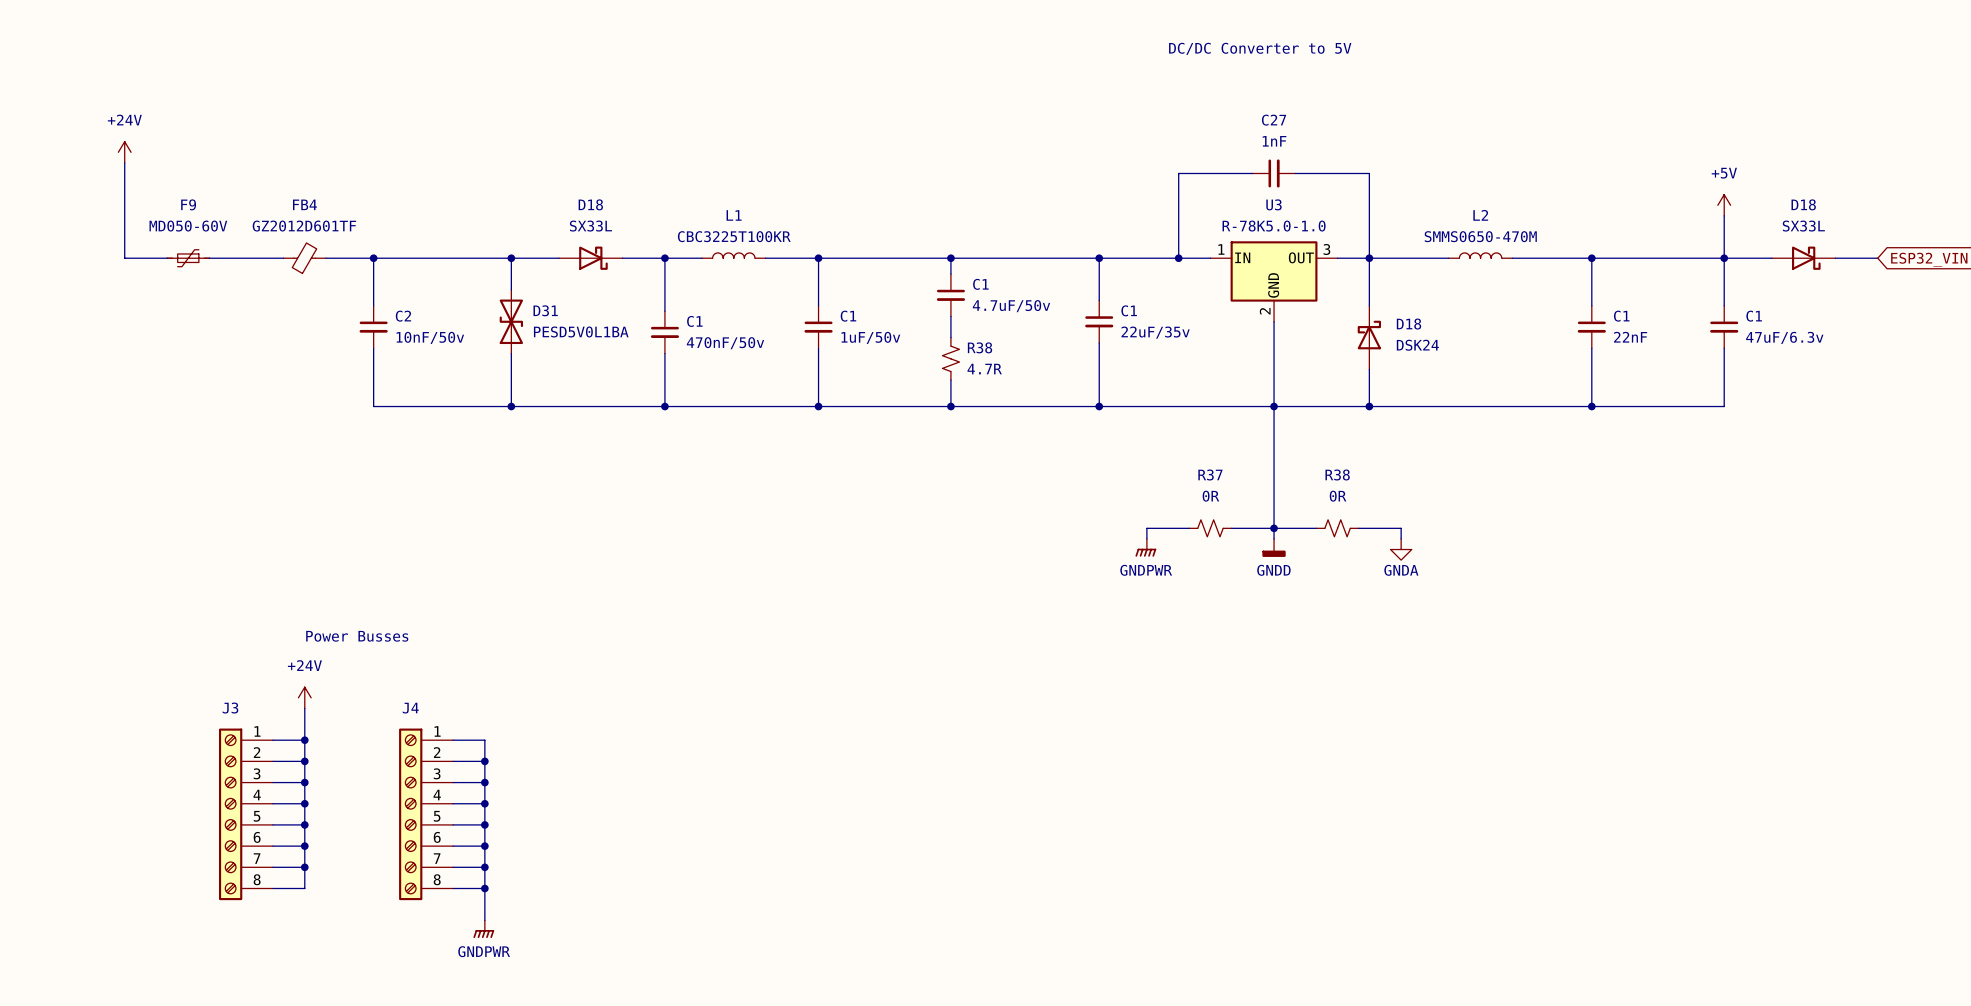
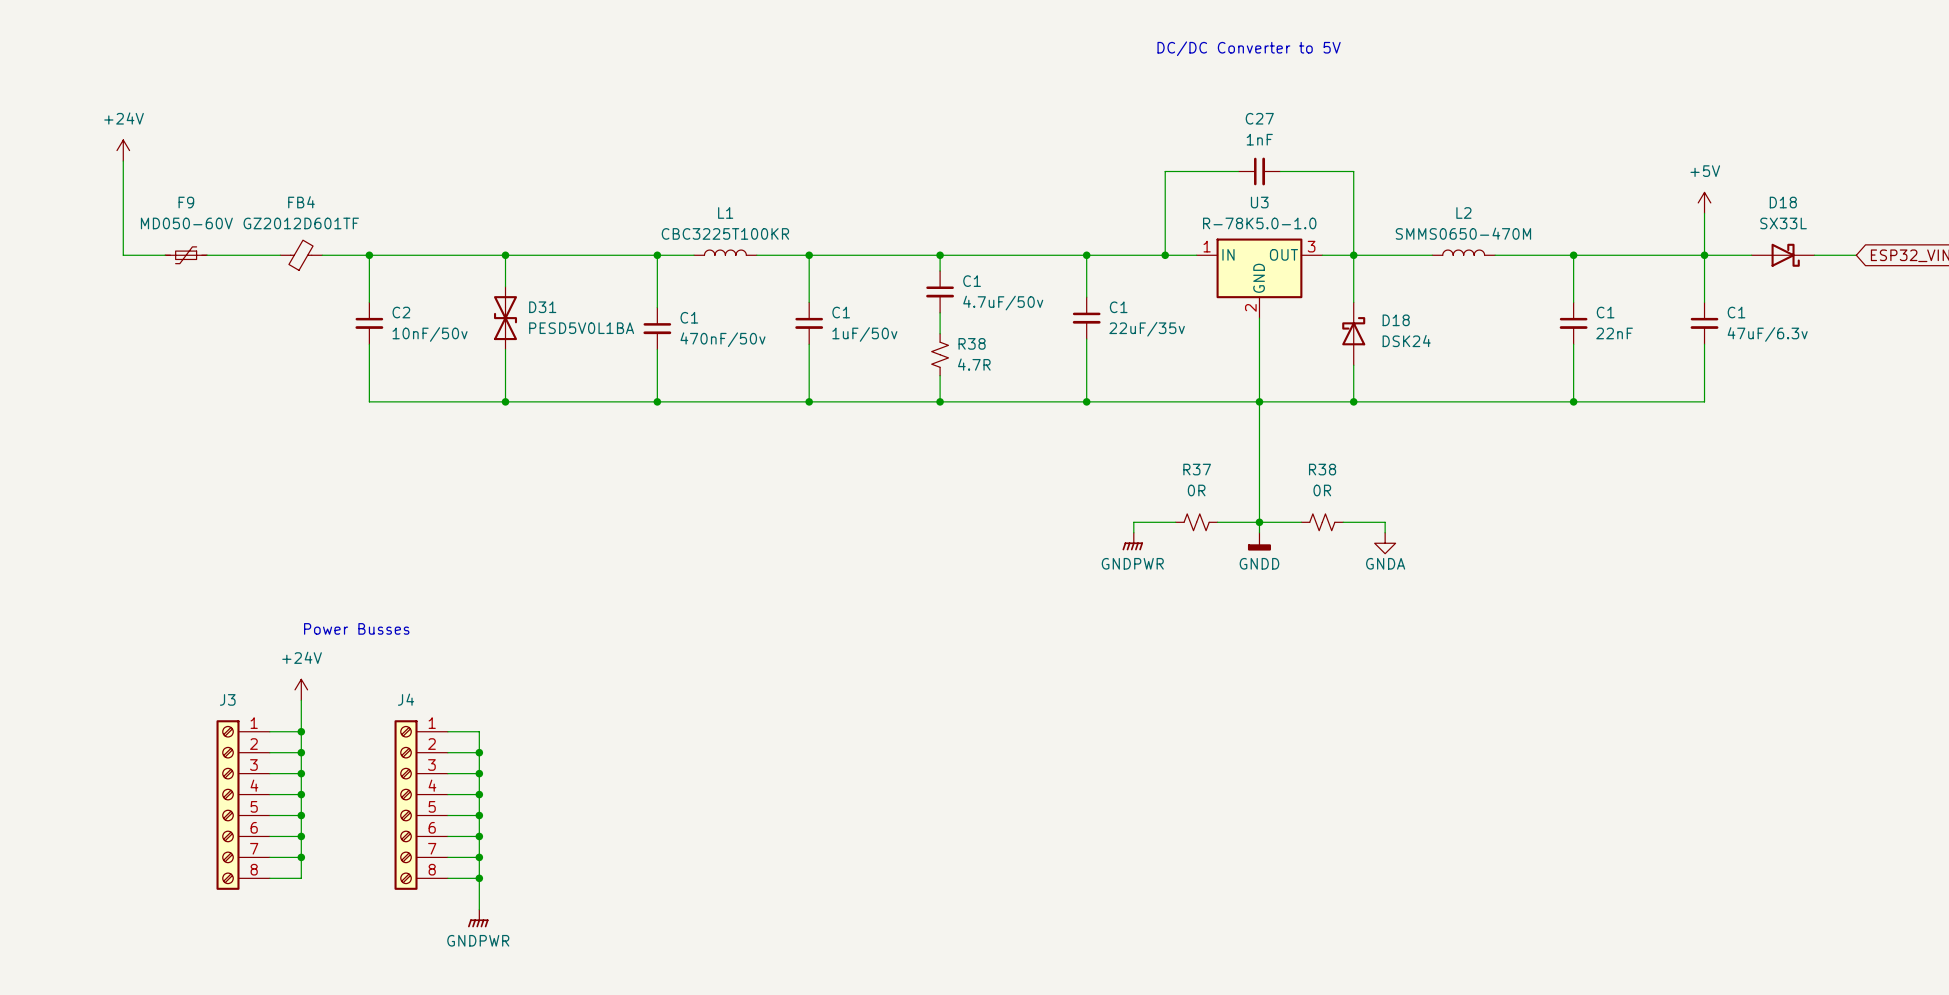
D18: SX33L (590, 258) -> none

